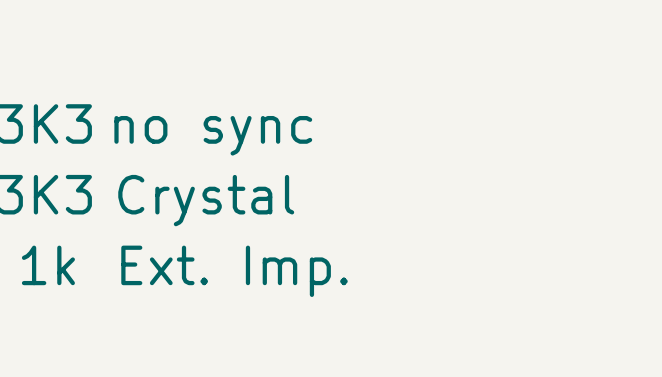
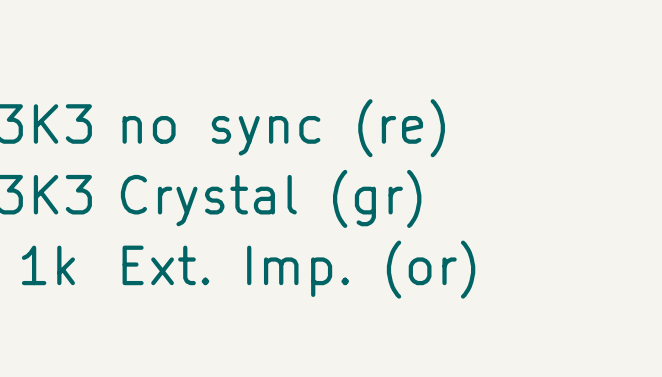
part value: no sync (213, 135) -> no sync (re) (283, 128)
part value: Crystal (206, 200) -> Crystal (gr) (271, 198)
part value: Ext. Imp. (234, 271) -> Ext. Imp. (or) (298, 269)

